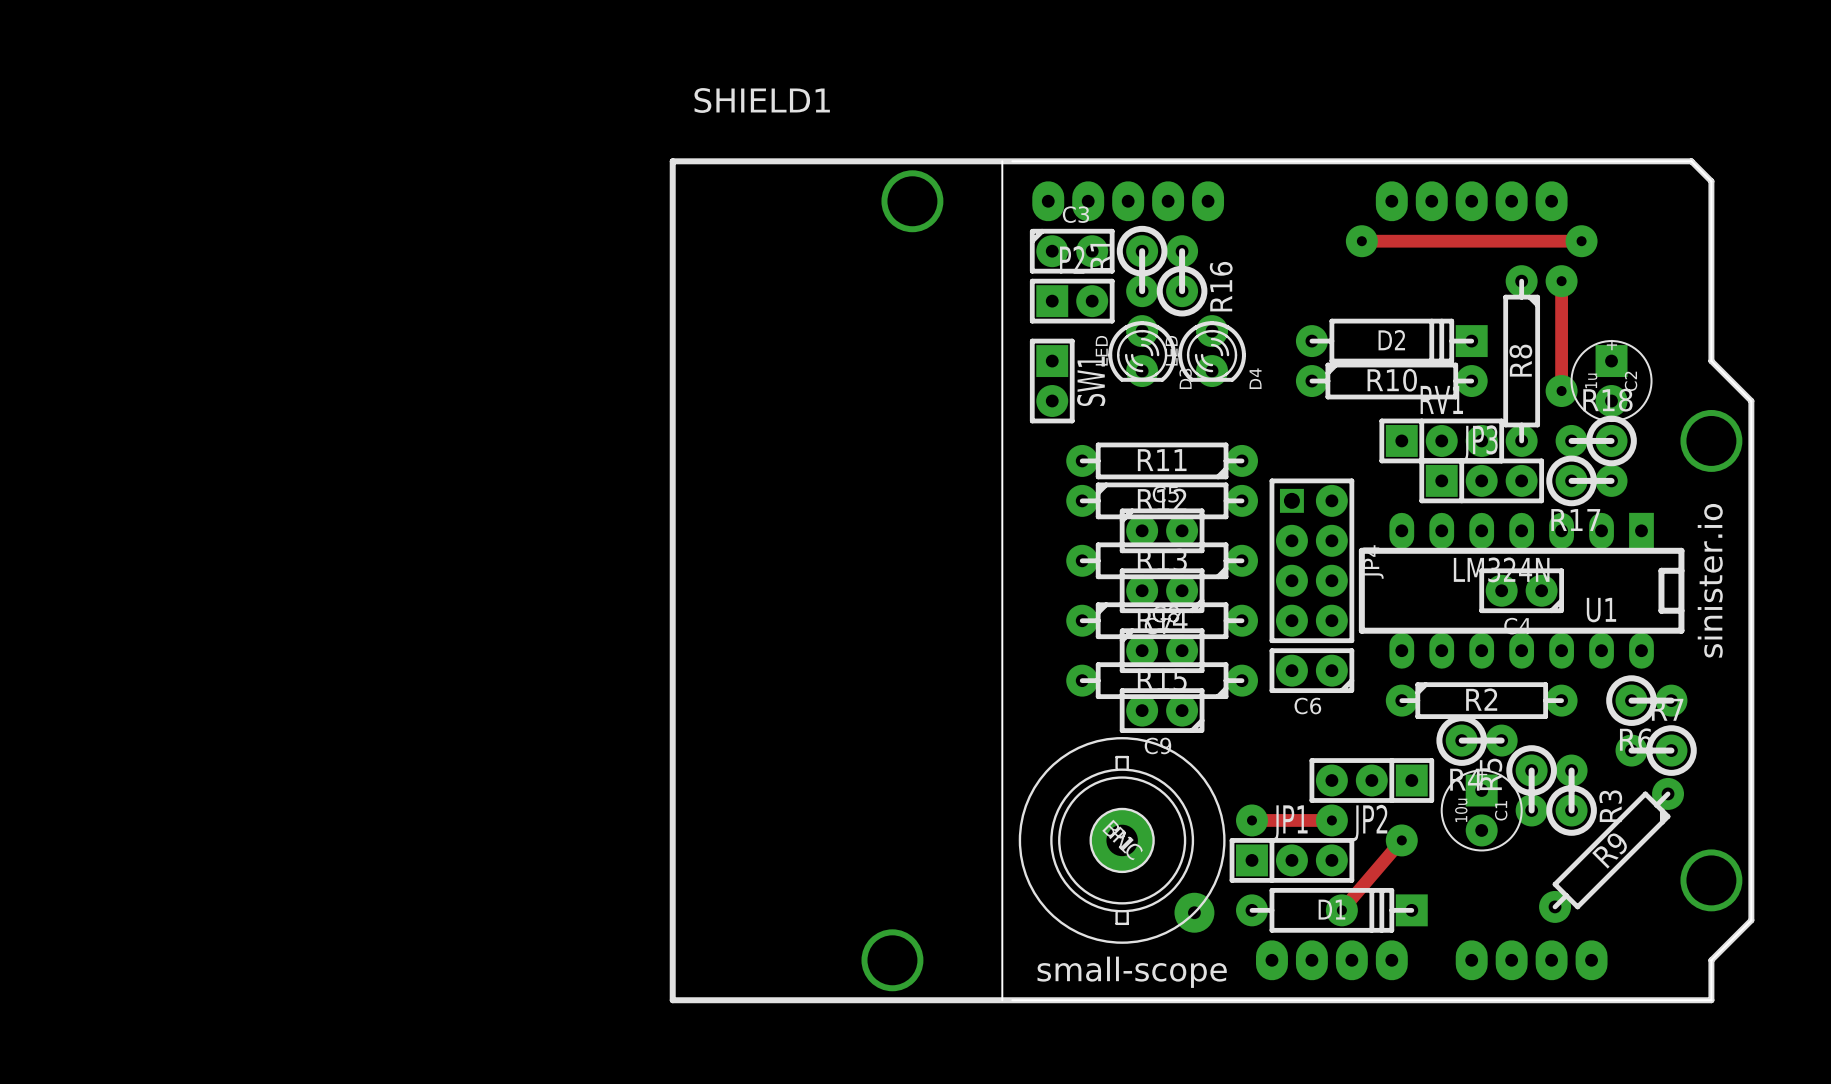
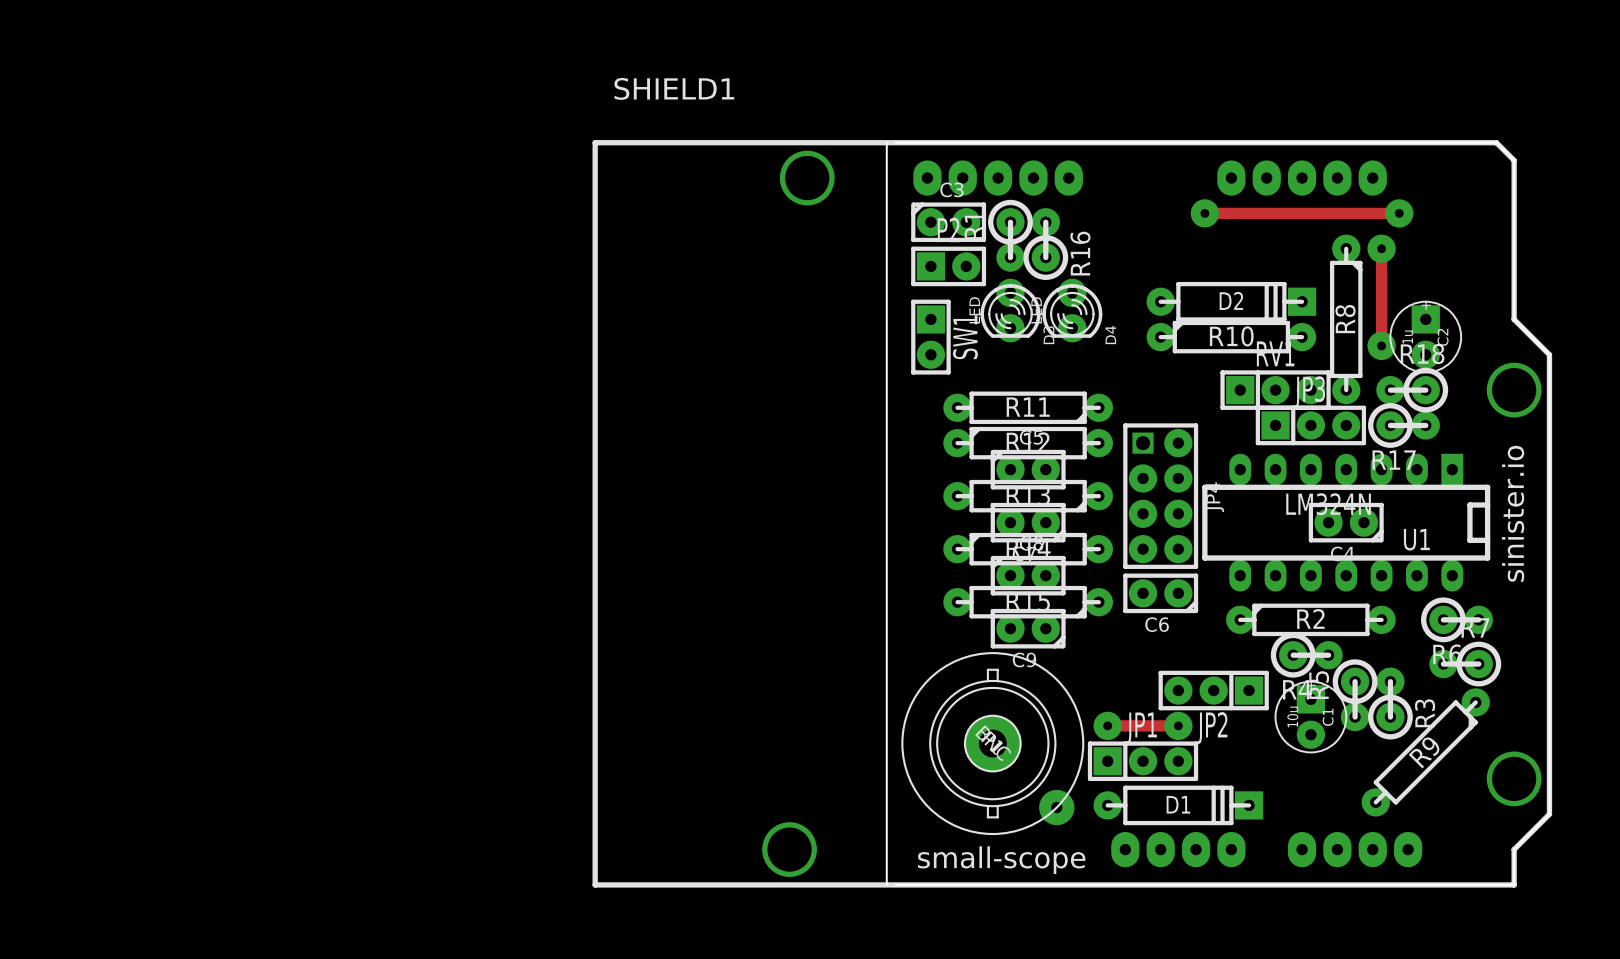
track: (1401, 840) (1341, 910) -> none
via: (1401, 840) -> none
via: (1341, 910) -> none

